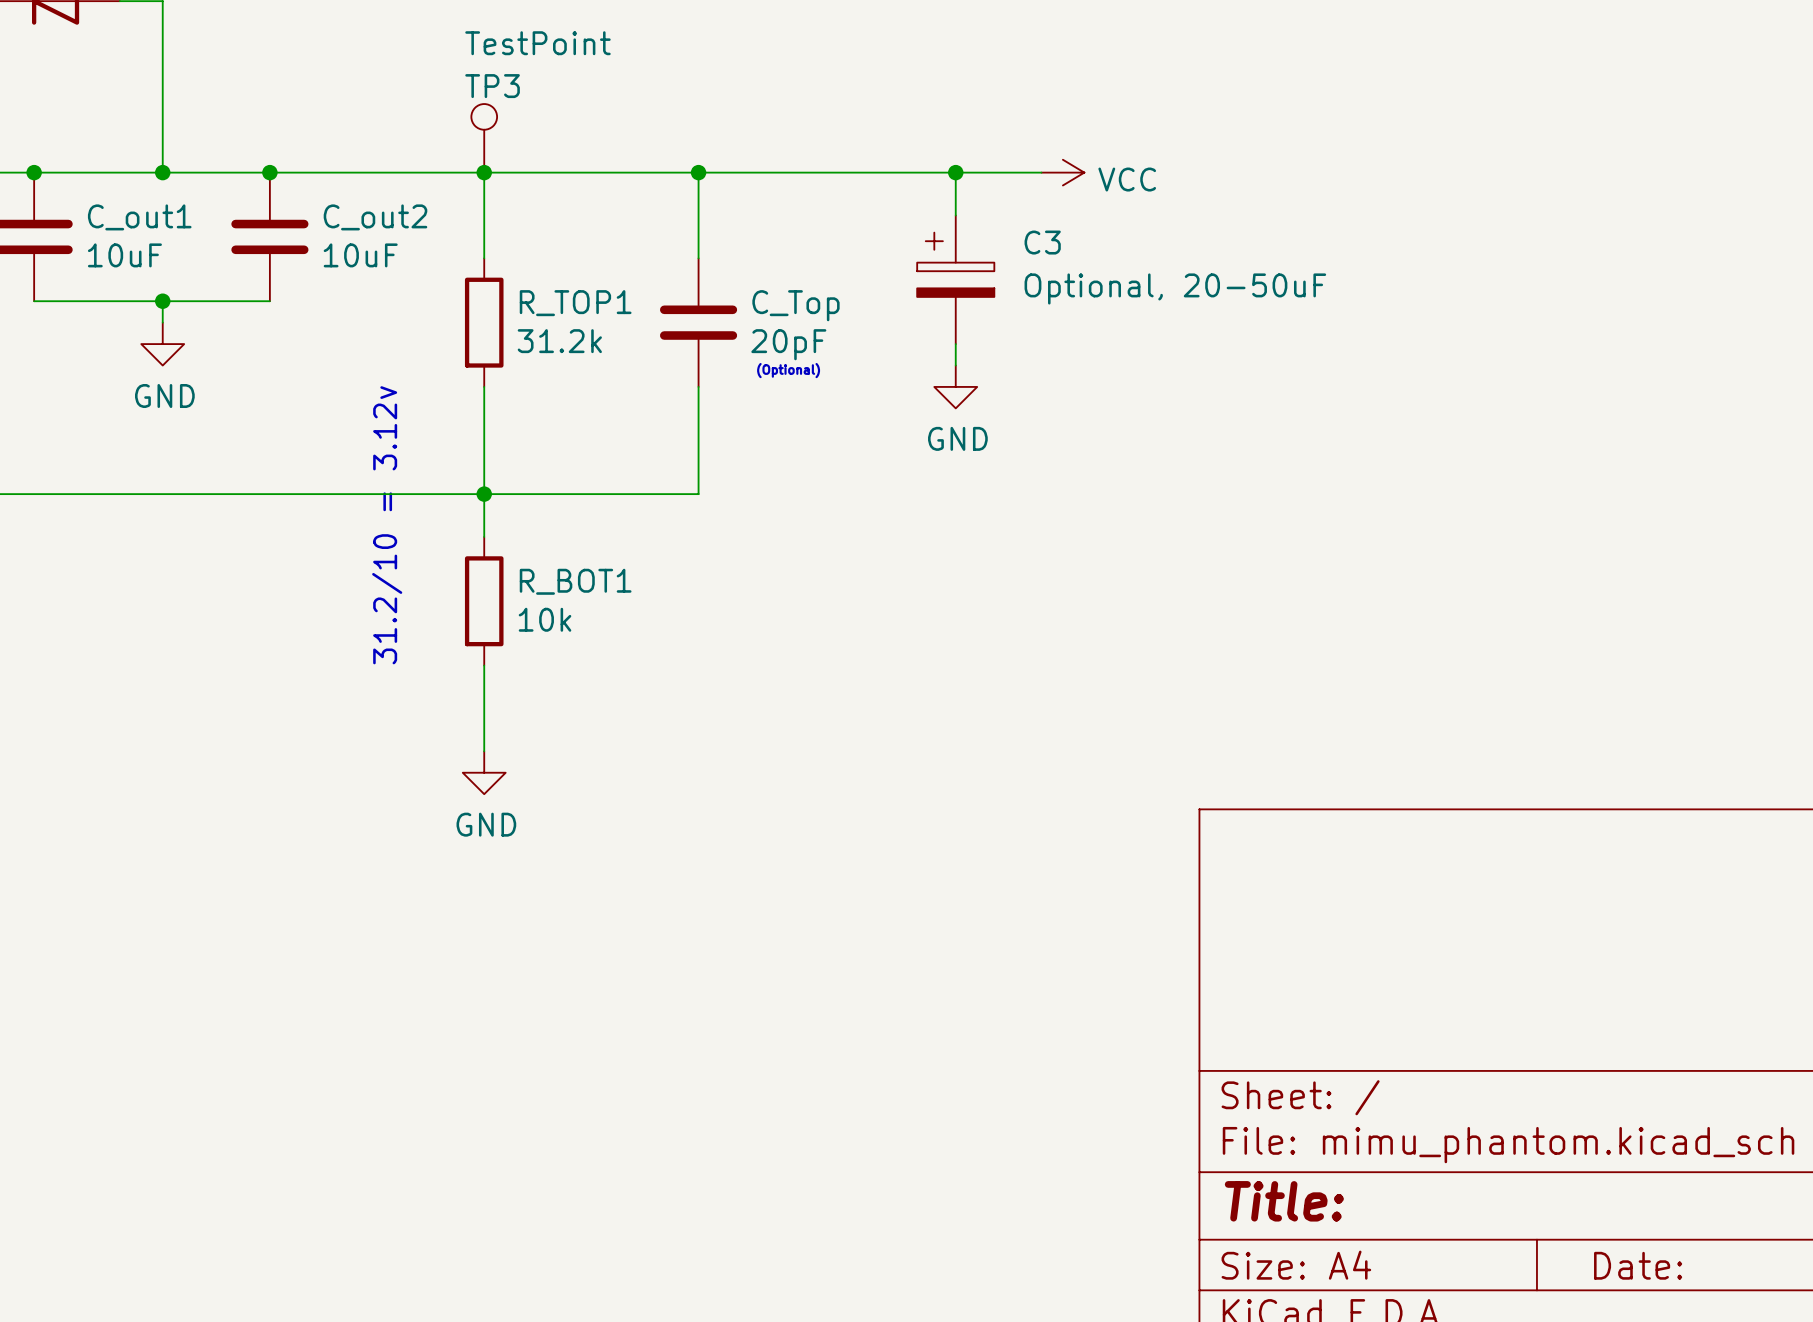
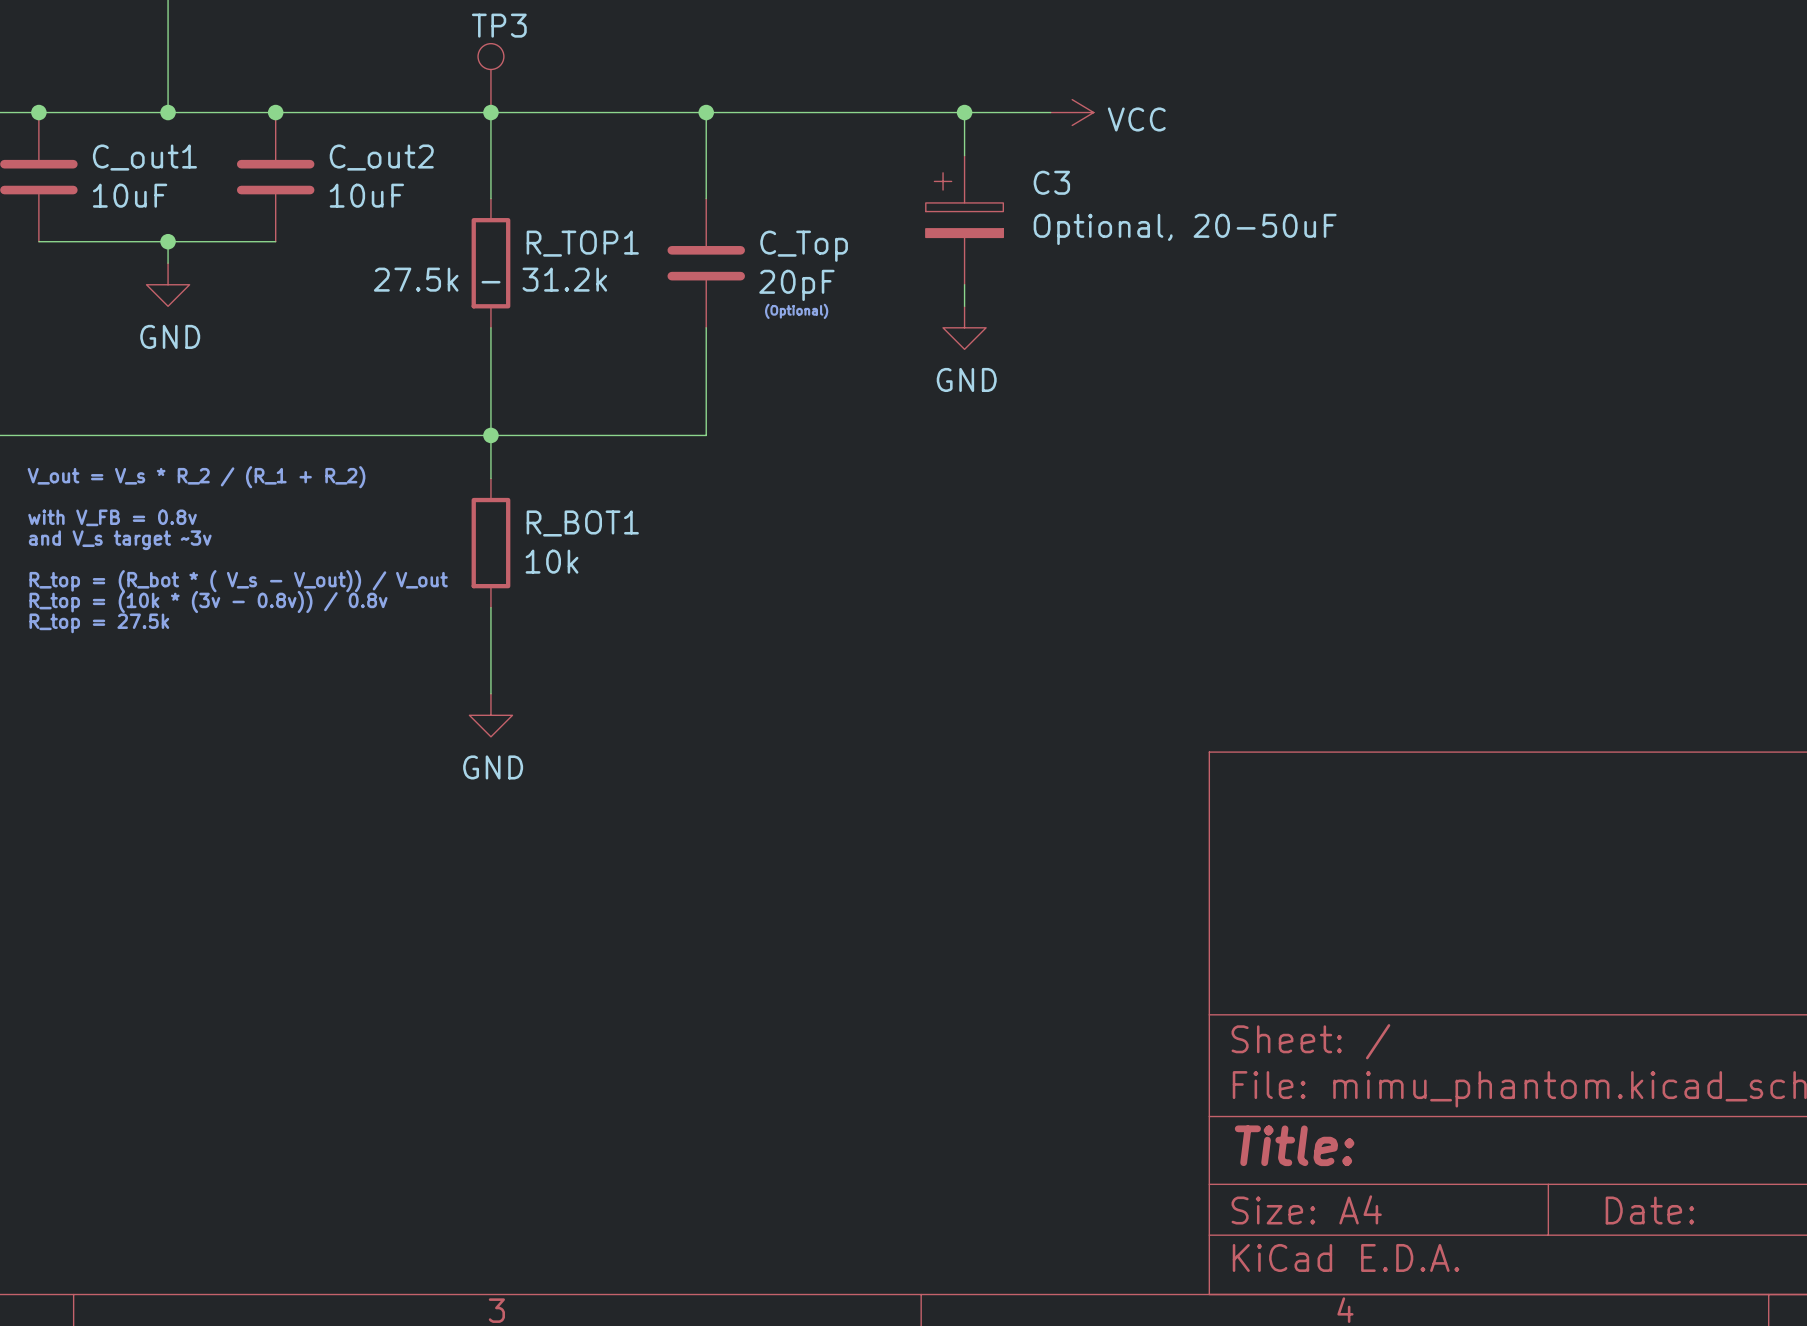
R_TOP1 value: 31.2k (559, 341) -> 27.5k - 31.2k (490, 279)
text: 31.2/10 = 3.12v (387, 525) -> none
text: none -> V_out = V_s * R_2 / (R_1 + R_2) (196, 477)
text: none -> with V_FB = 0.8v (112, 517)
text: none -> and V_s target ~3v (120, 540)
text: none -> R_top = (R_bot * ( V_s - V_out)) / V_out (238, 581)
text: none -> R_top = (10k * (3v - 0.8v)) / 0.8v (208, 601)
text: none -> R_top = 27.5k (99, 623)

